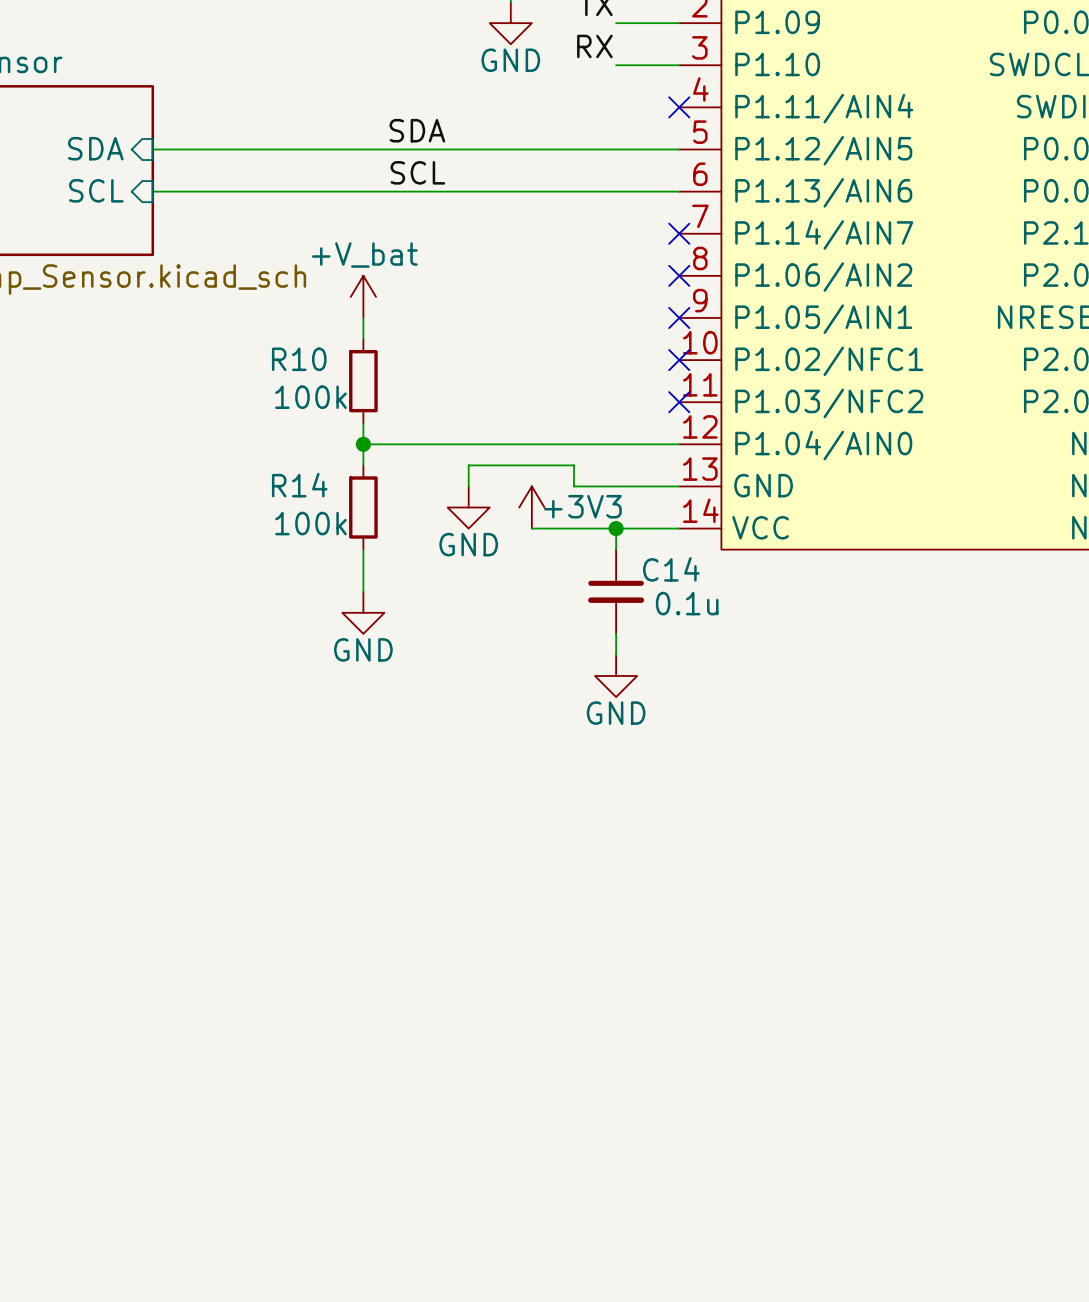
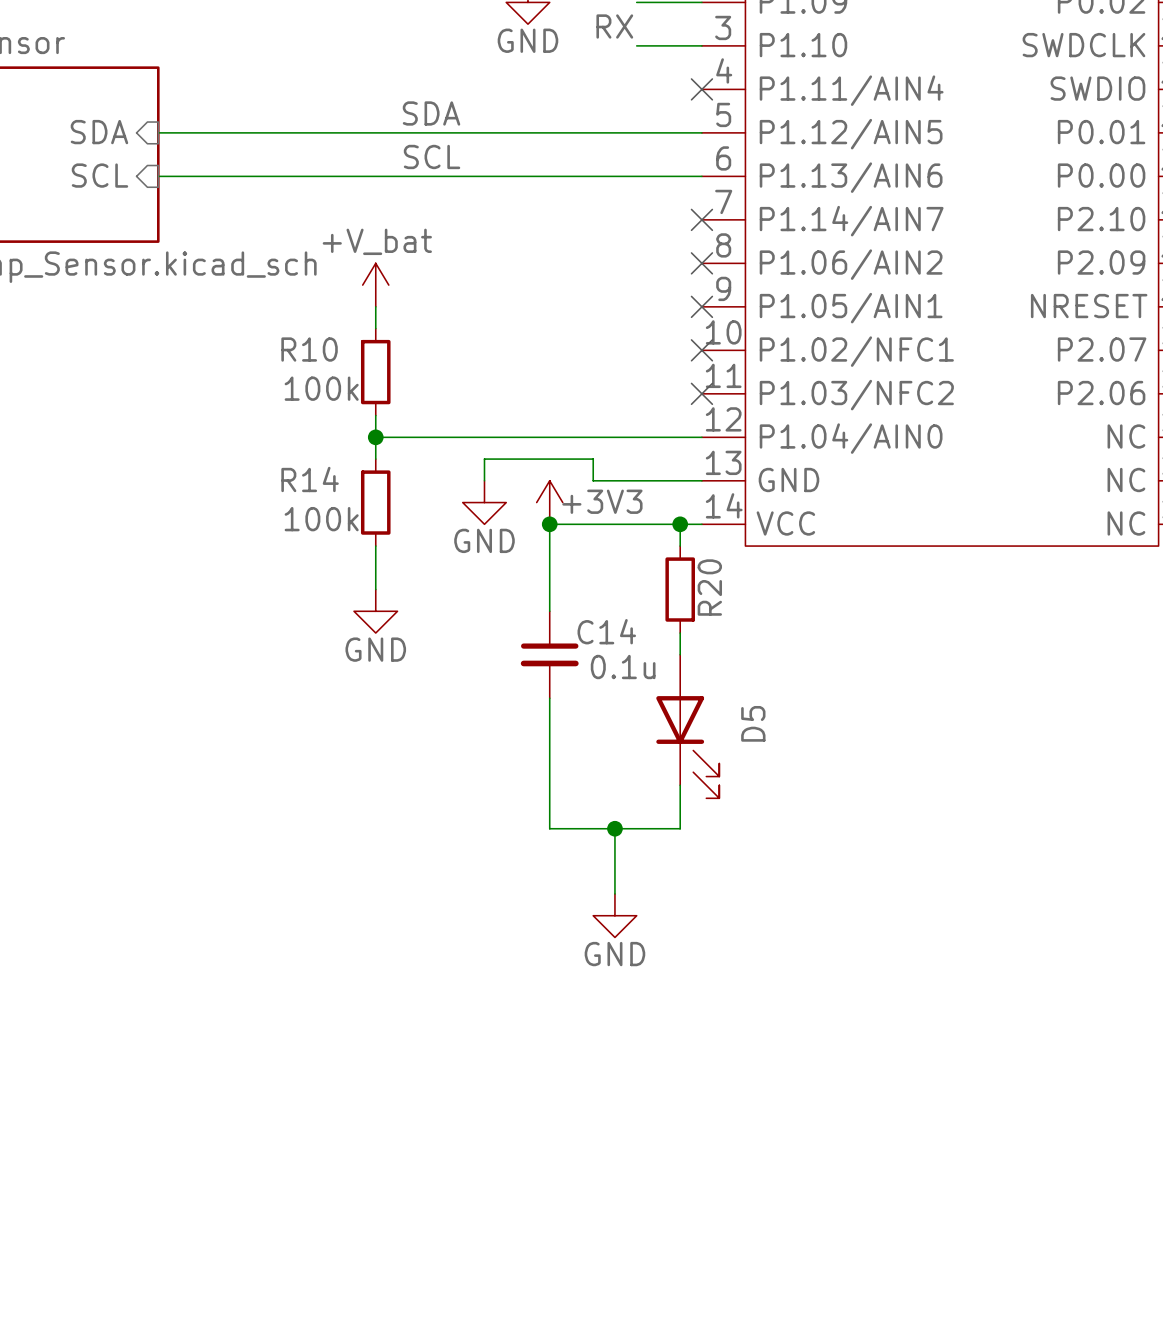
wire: none -> (549, 524) (549, 611)
junction: none -> (549, 524)
wire: (616, 528) (616, 549) -> (680, 524) (680, 546)
junction: (616, 528) -> none
junction: none -> (680, 524)
C14 position: (616, 591) -> (549, 654)
R20: none -> (680, 589)
wire: (616, 633) (616, 654) -> (680, 633) (680, 654)
power symbol position: GND (616, 675) -> GND (614, 915)
wire: none -> (549, 698) (549, 828) (680, 828) (680, 785)
D5: none -> (687, 726)
wire: none -> (614, 828) (614, 893)
junction: none -> (614, 828)

